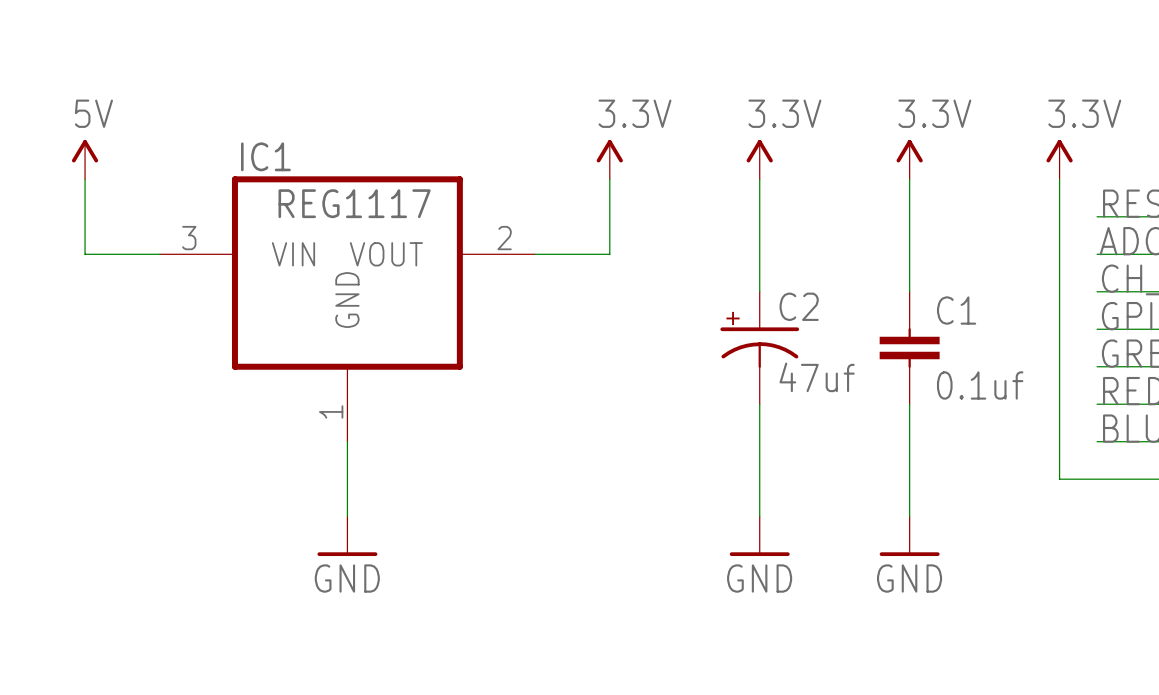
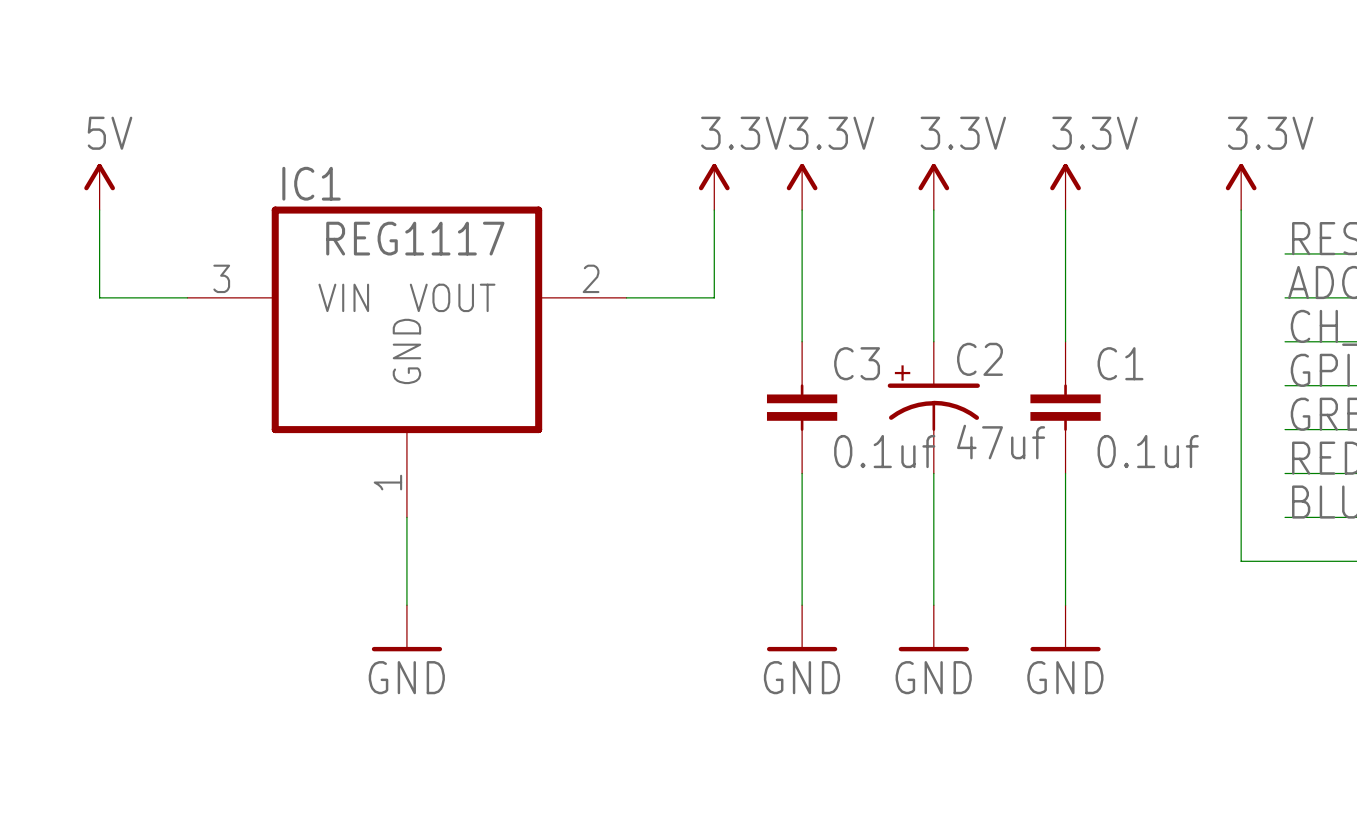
power symbol: none -> 3.3V (802, 187)
power symbol: 3.3V (759, 159) -> none
power symbol: none -> 3.3V (933, 187)
wire: none -> (802, 210) (802, 341)
wire: (759, 179) (759, 291) -> (933, 210) (933, 341)
C3: none -> 0.1uf (802, 407)
C2 position: (759, 348) -> (933, 407)
wire: none -> (802, 473) (802, 605)
wire: (759, 404) (759, 516) -> (933, 473) (933, 605)
power symbol: none -> GND (802, 628)
power symbol: GND (759, 536) -> none
power symbol: none -> GND (933, 628)

